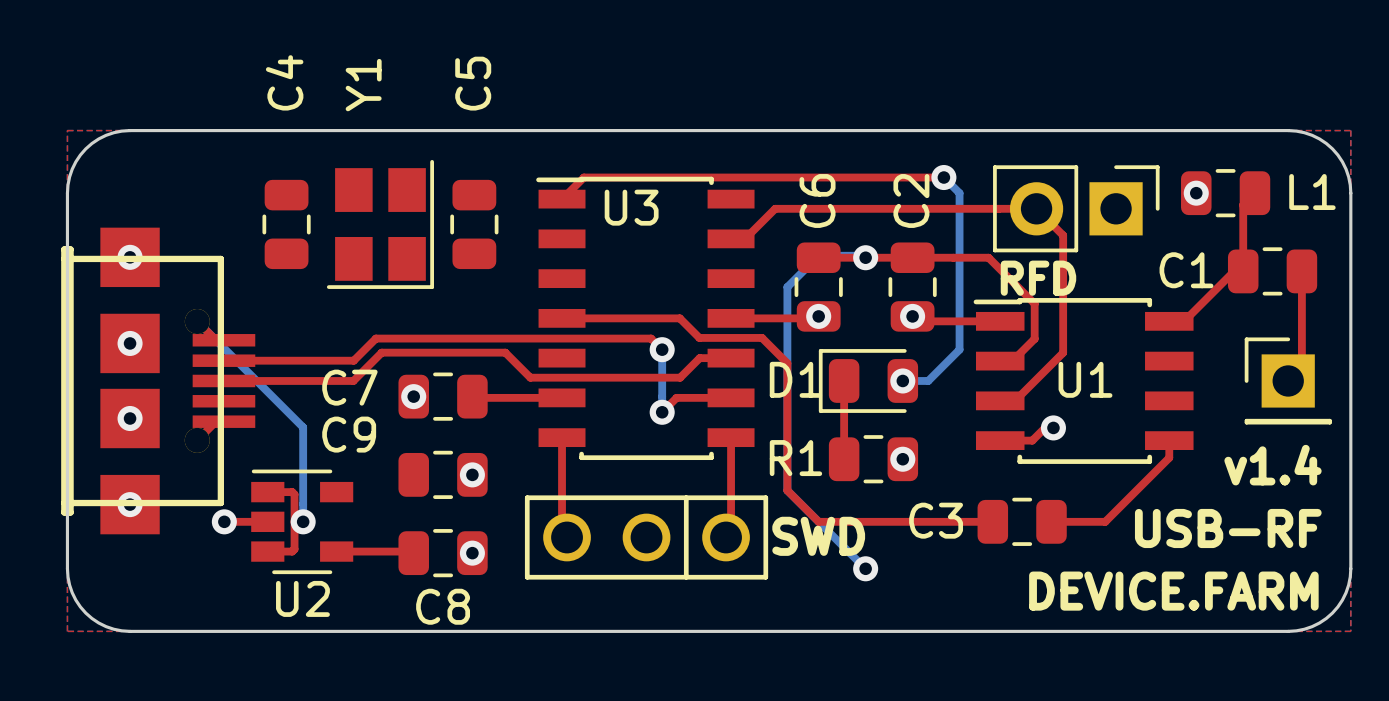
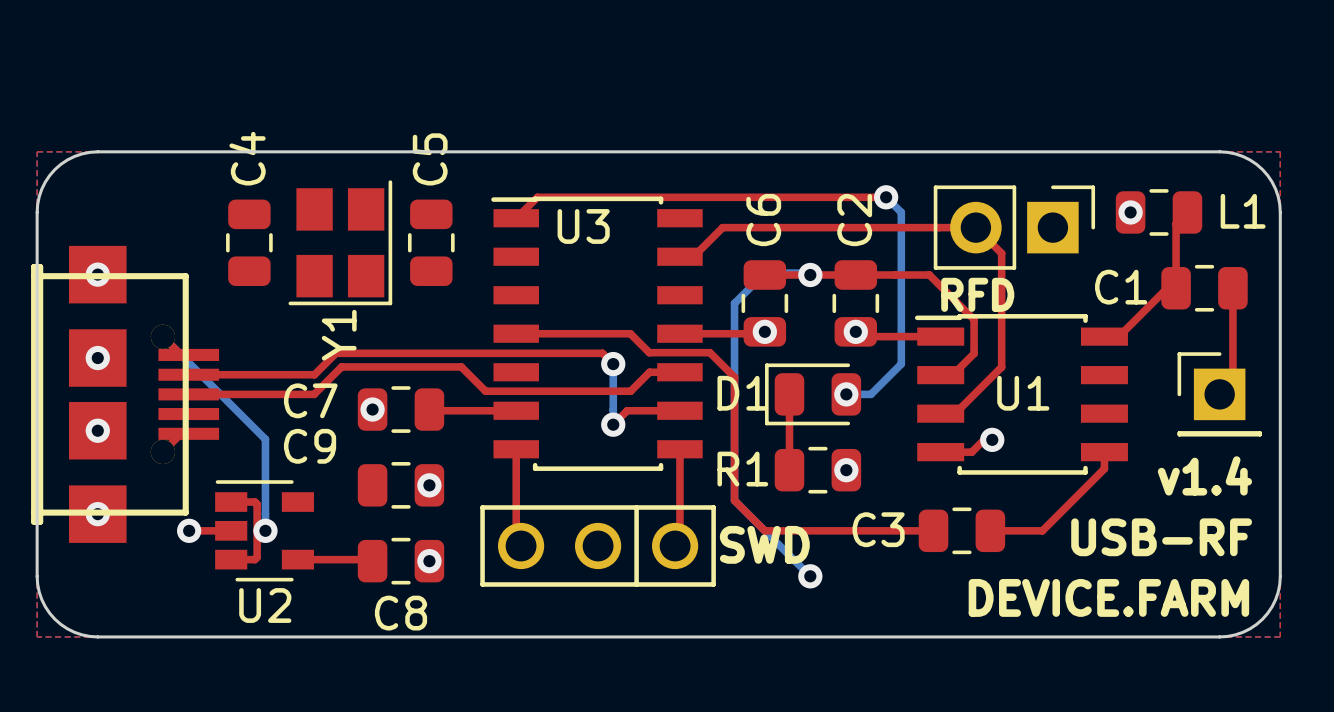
C4 name position: C4 (284, 82) -> C4 (247, 158)
C5 name position: C5 (473, 83) -> C5 (430, 159)
Y1 name position: Y1 (363, 85) -> Y1 (339, 335)

